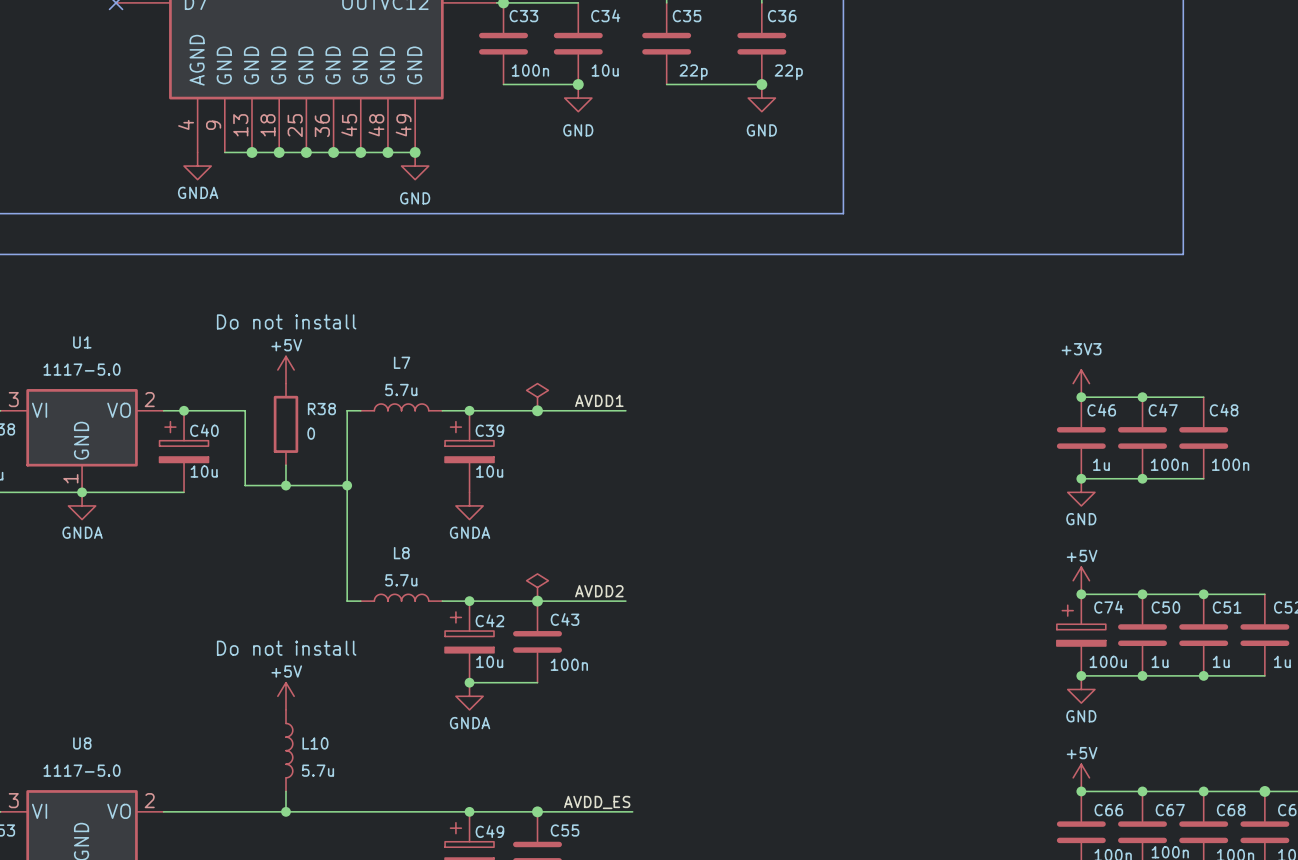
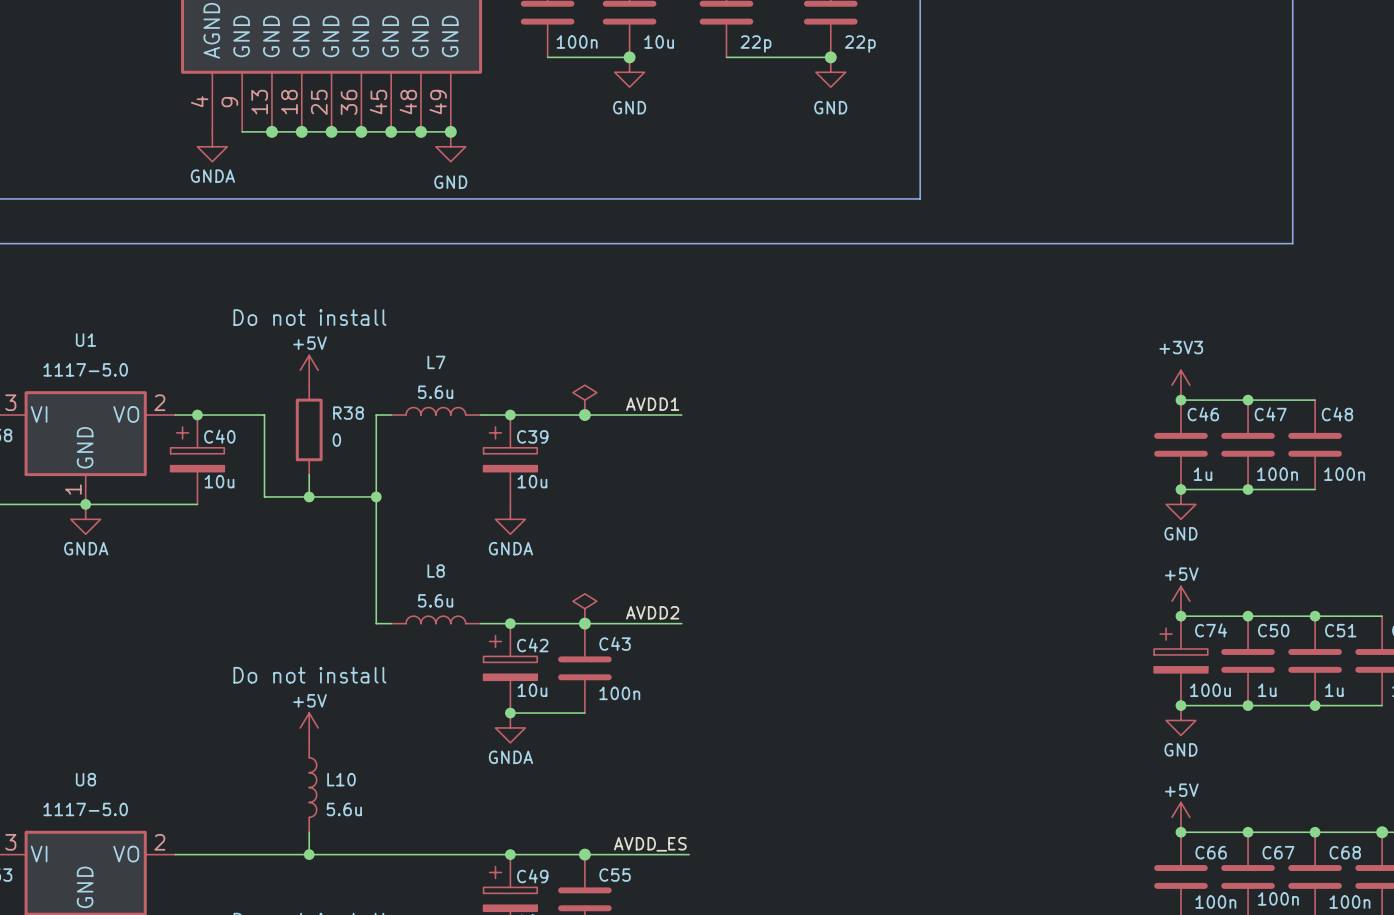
L7 value: 5.7u (401, 389) -> 5.6u (435, 392)
L8 value: 5.7u (401, 580) -> 5.6u (435, 600)
L10 value: 5.7u (317, 770) -> 5.6u (344, 809)

